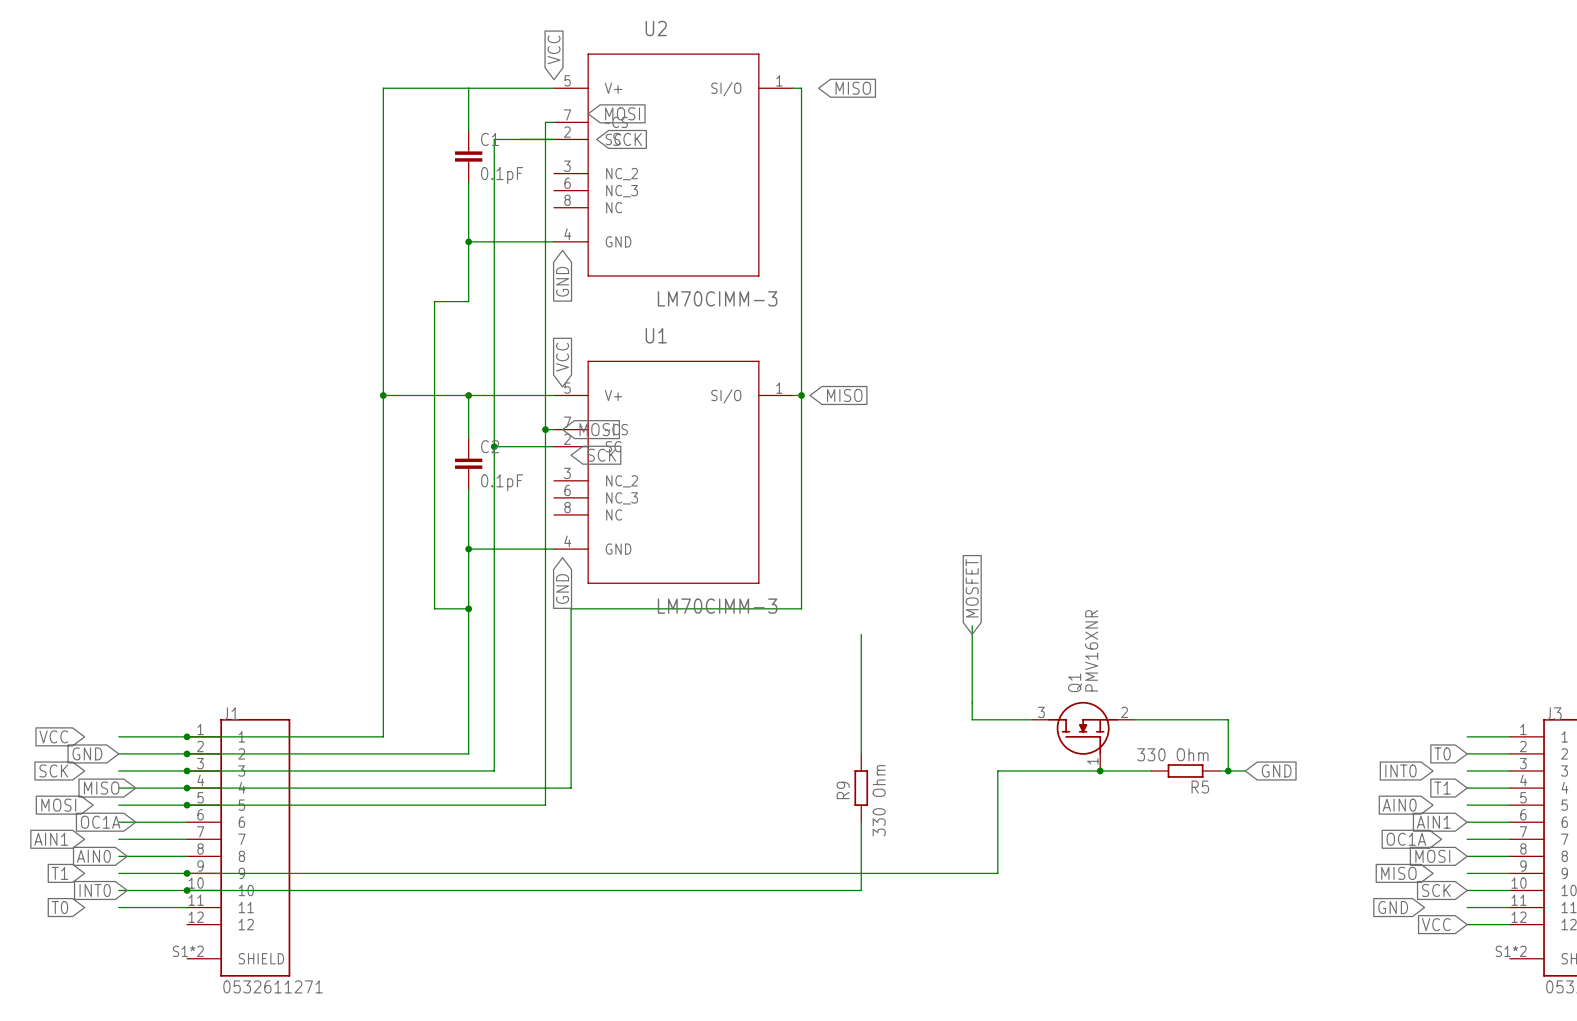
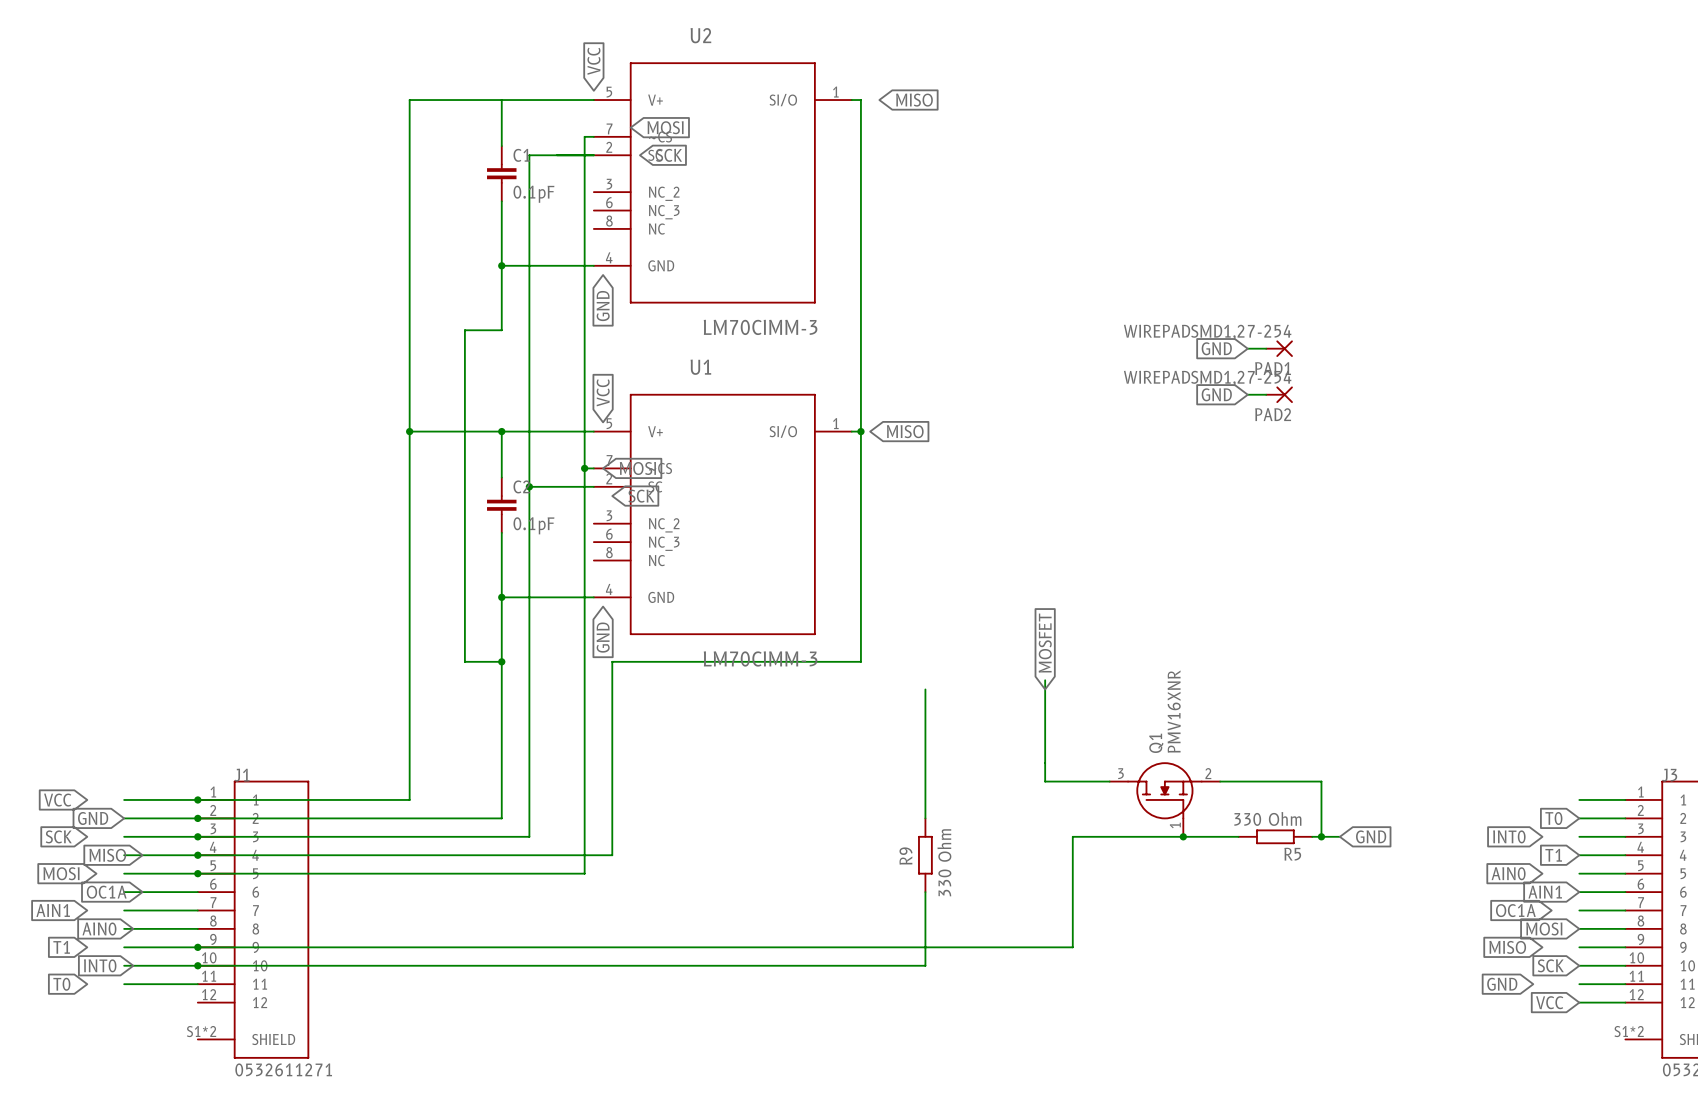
global label: none -> GND (1216, 348)
wire: none -> (1247, 348) (1266, 348)
PAD1: none -> WIREPADSMD1,27-254 (1279, 348)
global label: none -> GND (1216, 394)
wire: none -> (1247, 394) (1266, 394)
PAD2: none -> WIREPADSMD1,27-254 (1279, 394)

